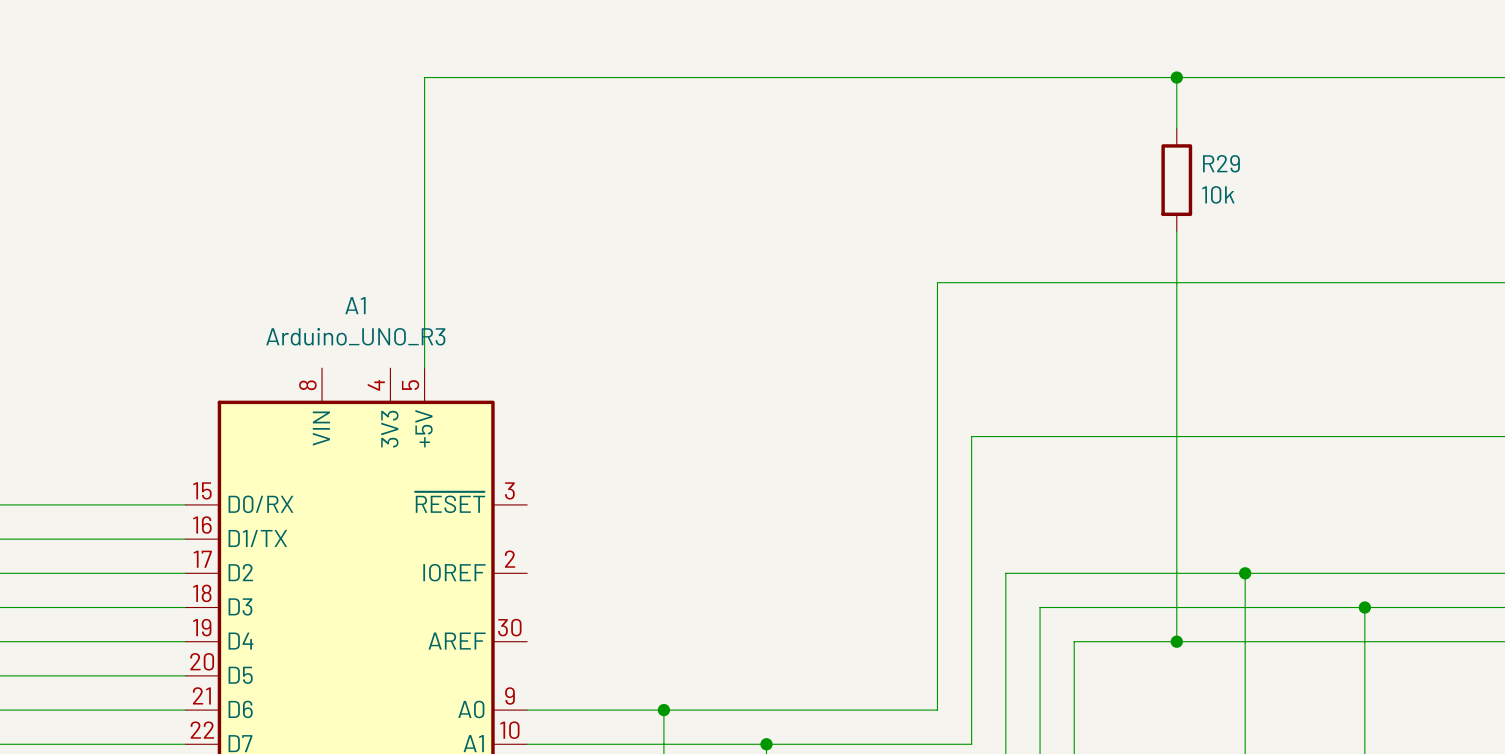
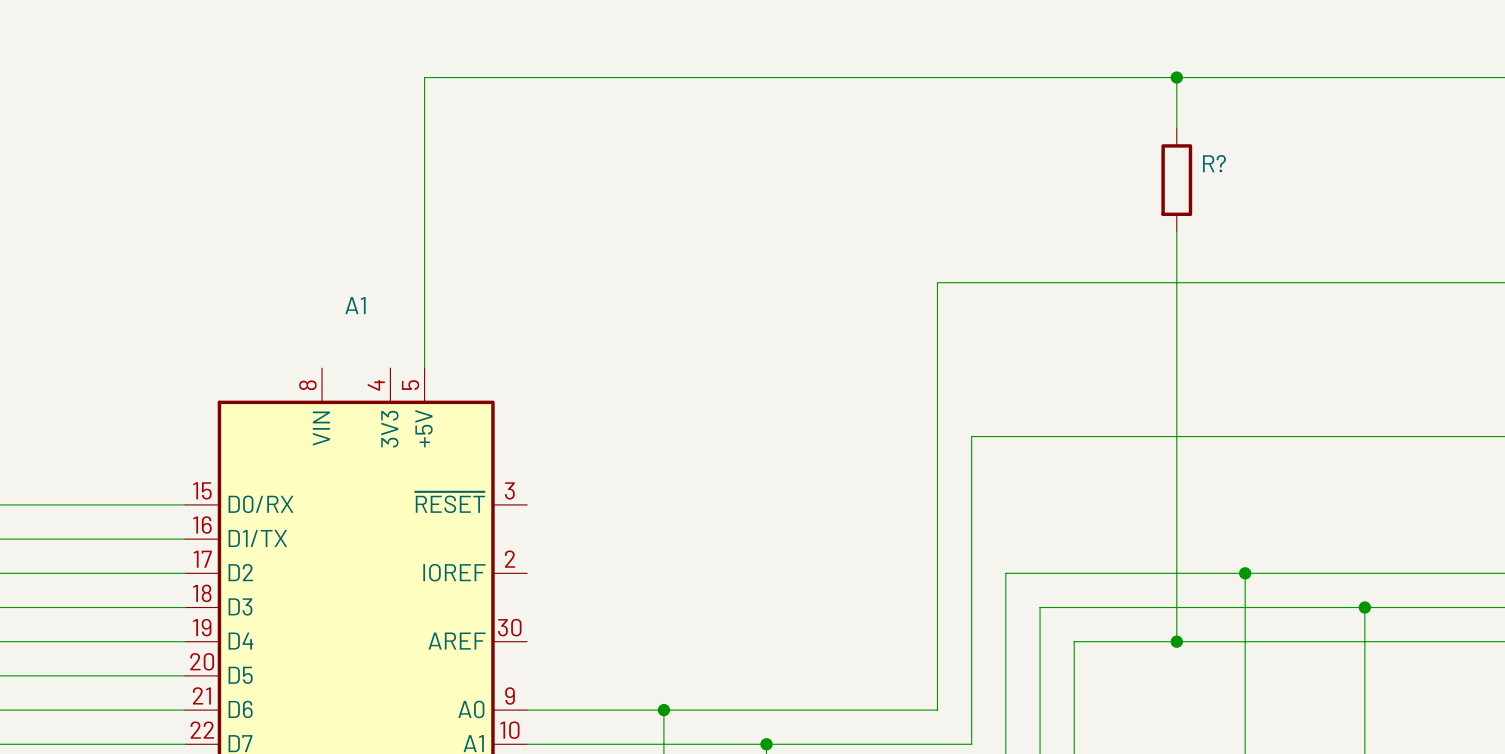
R29 name: R29 (1221, 163) -> R? (1214, 163)
R29 value: 10k (1218, 194) -> none
A1 value: Arduino_UNO_R3 (355, 336) -> none

